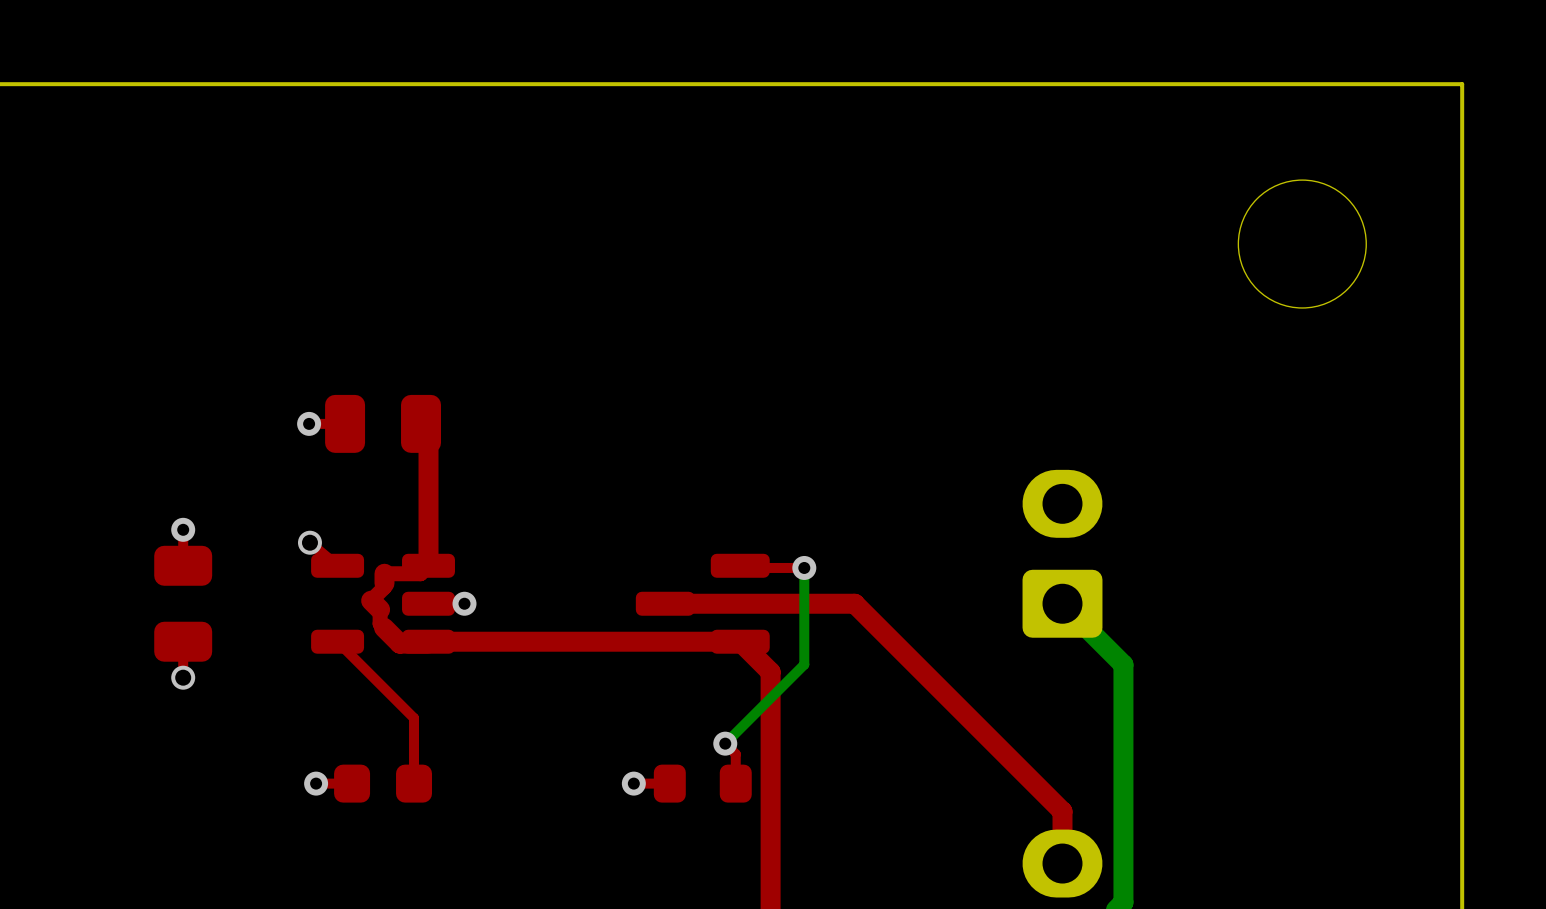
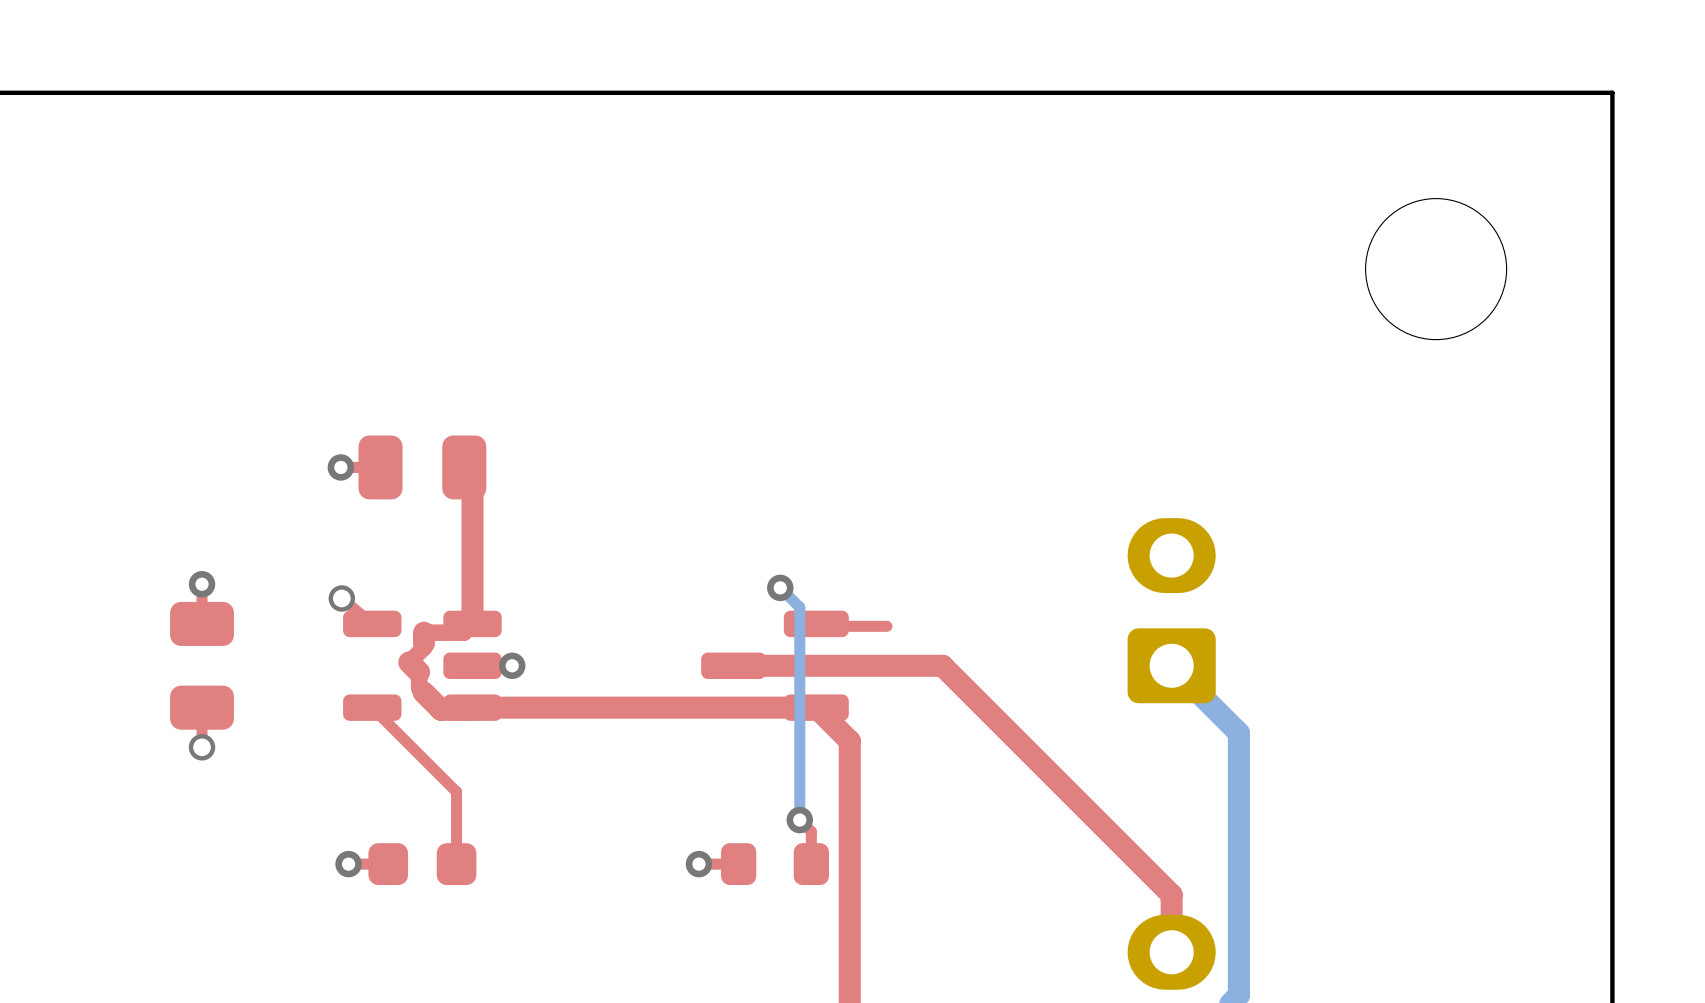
bottom track: (804, 567) (804, 664) (725, 743) -> (780, 587) (799, 607) (799, 820)
via position: (804, 567) -> (780, 587)

